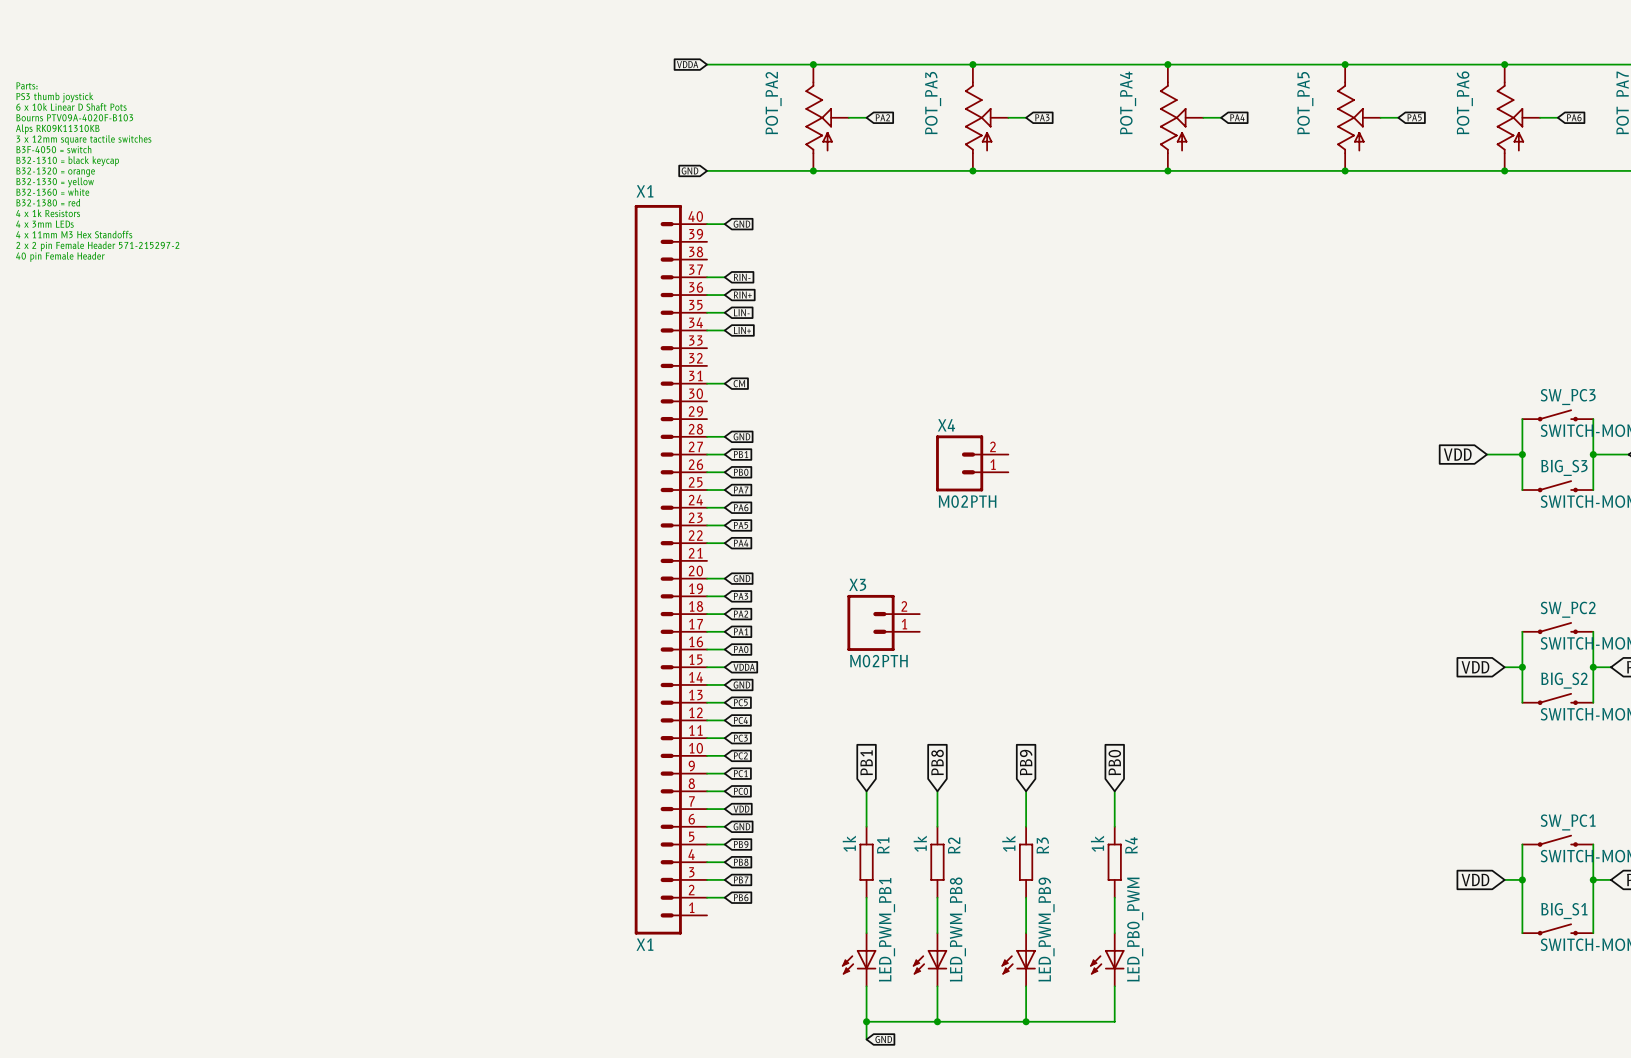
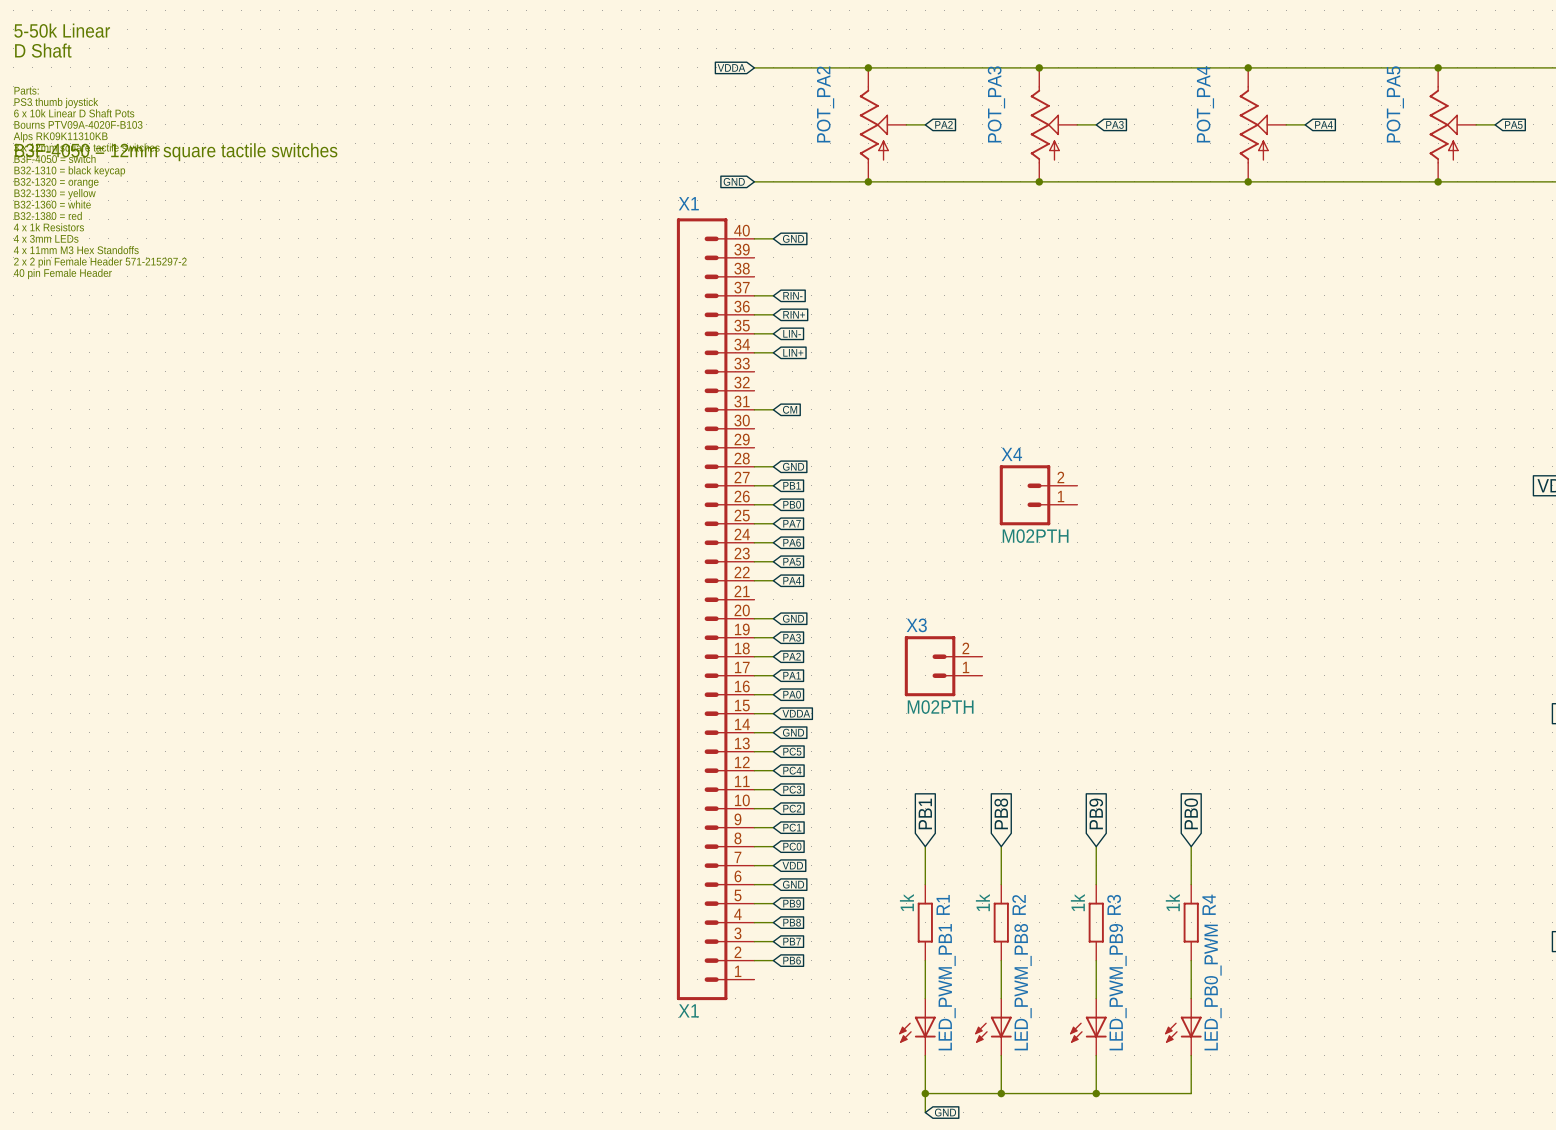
text: none -> 5-50k Linear (62, 30)
text: none -> D Shaft (43, 50)
text: none -> B3F-4050 = 12mm square tactile switches (176, 152)

